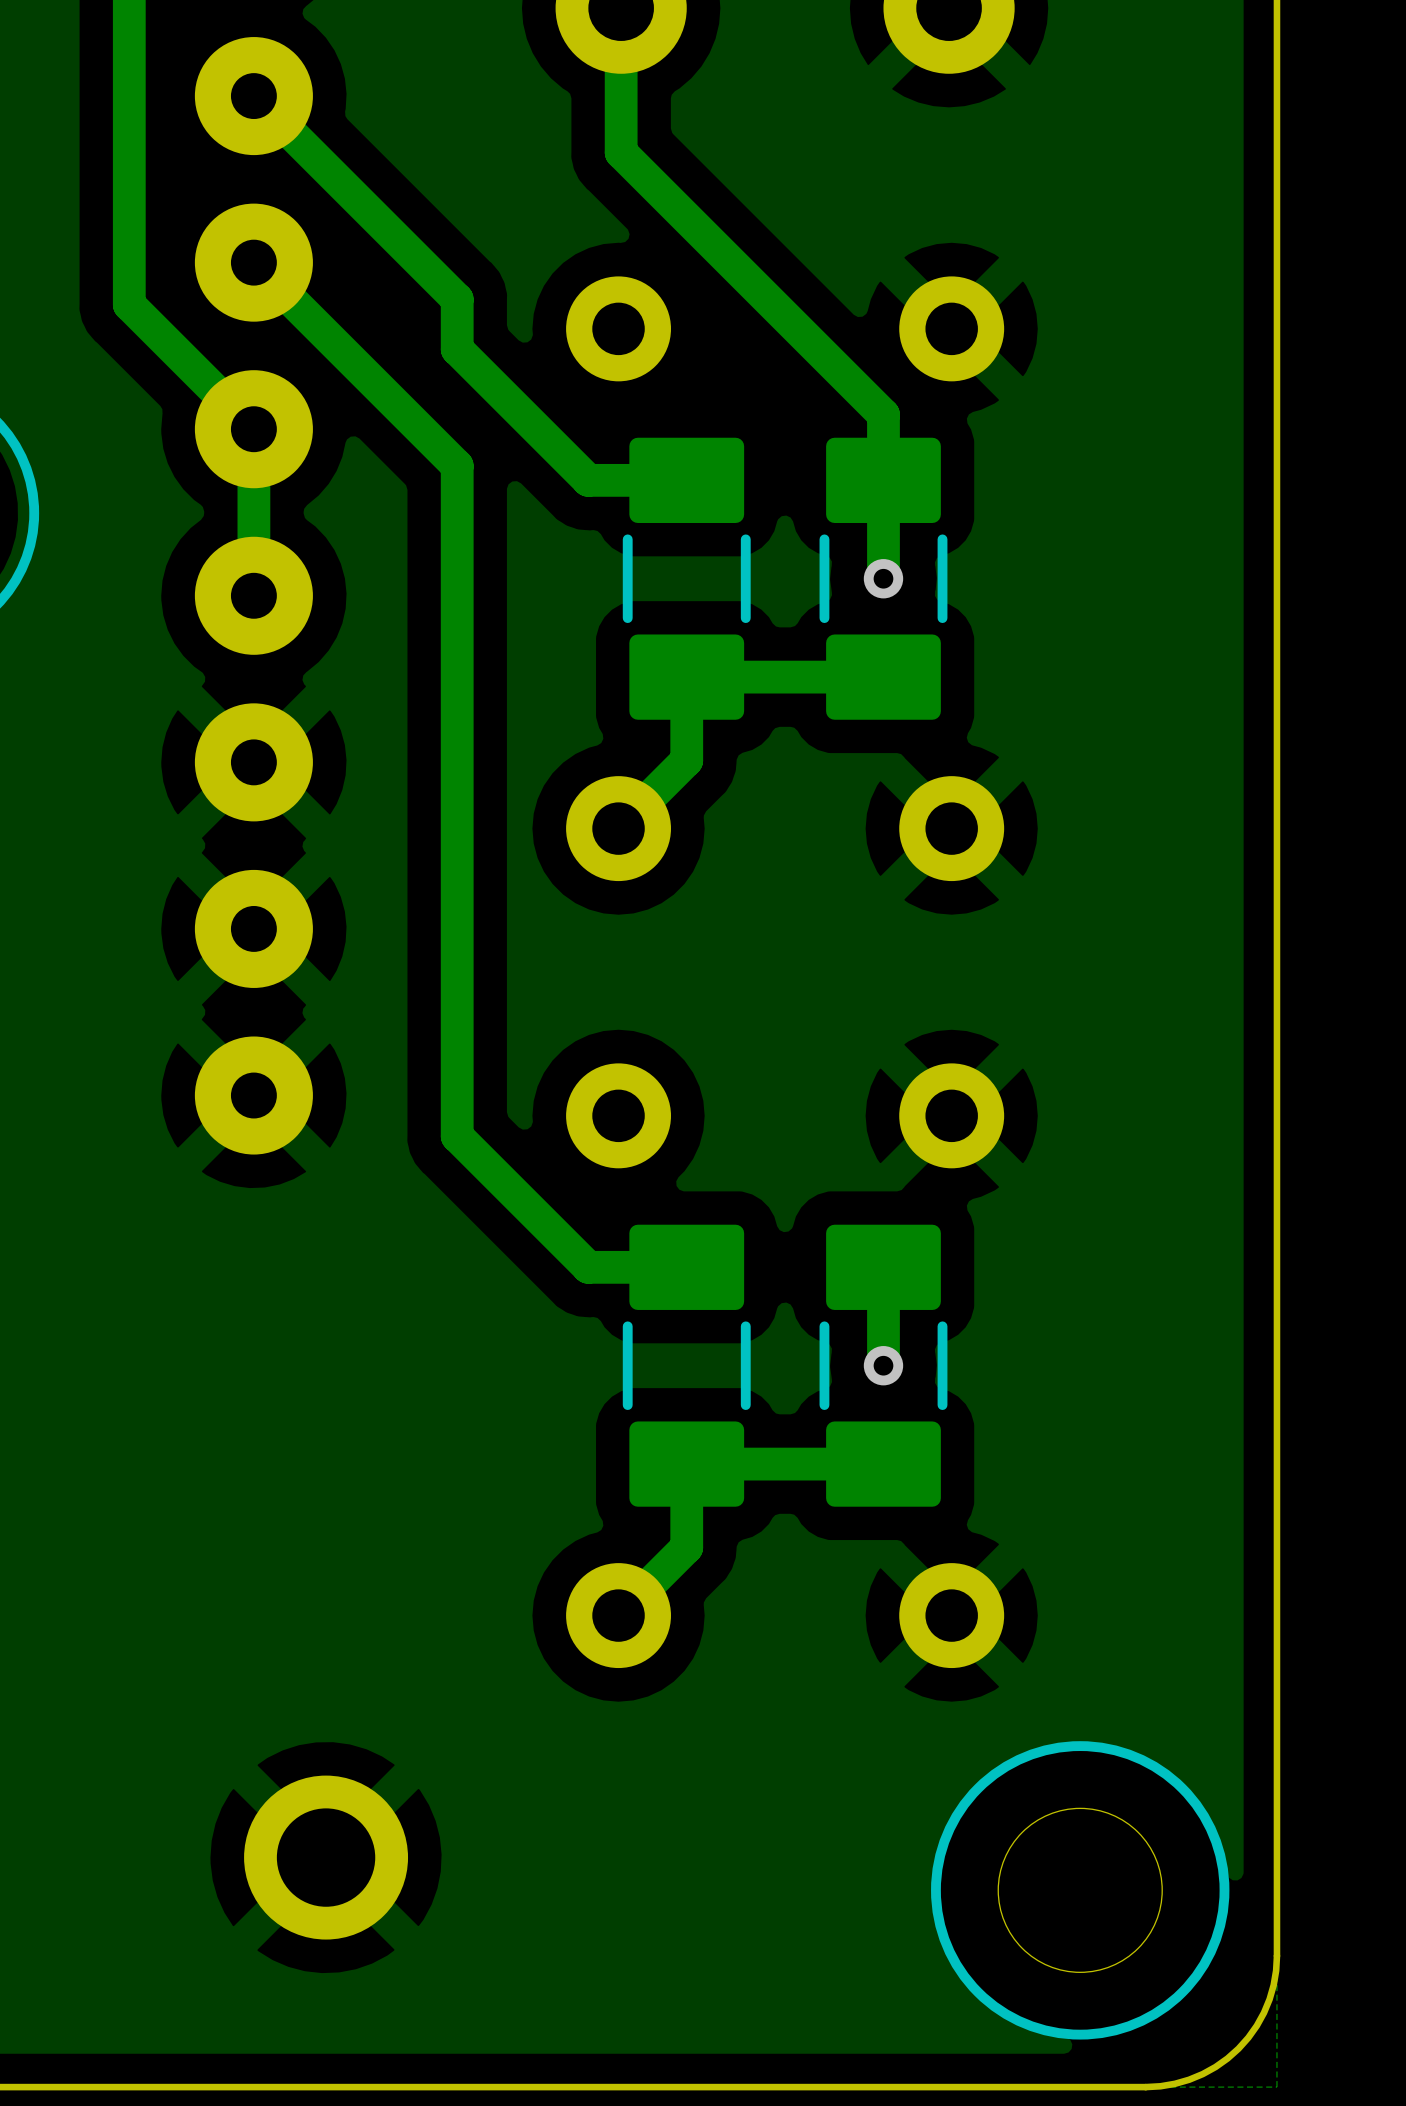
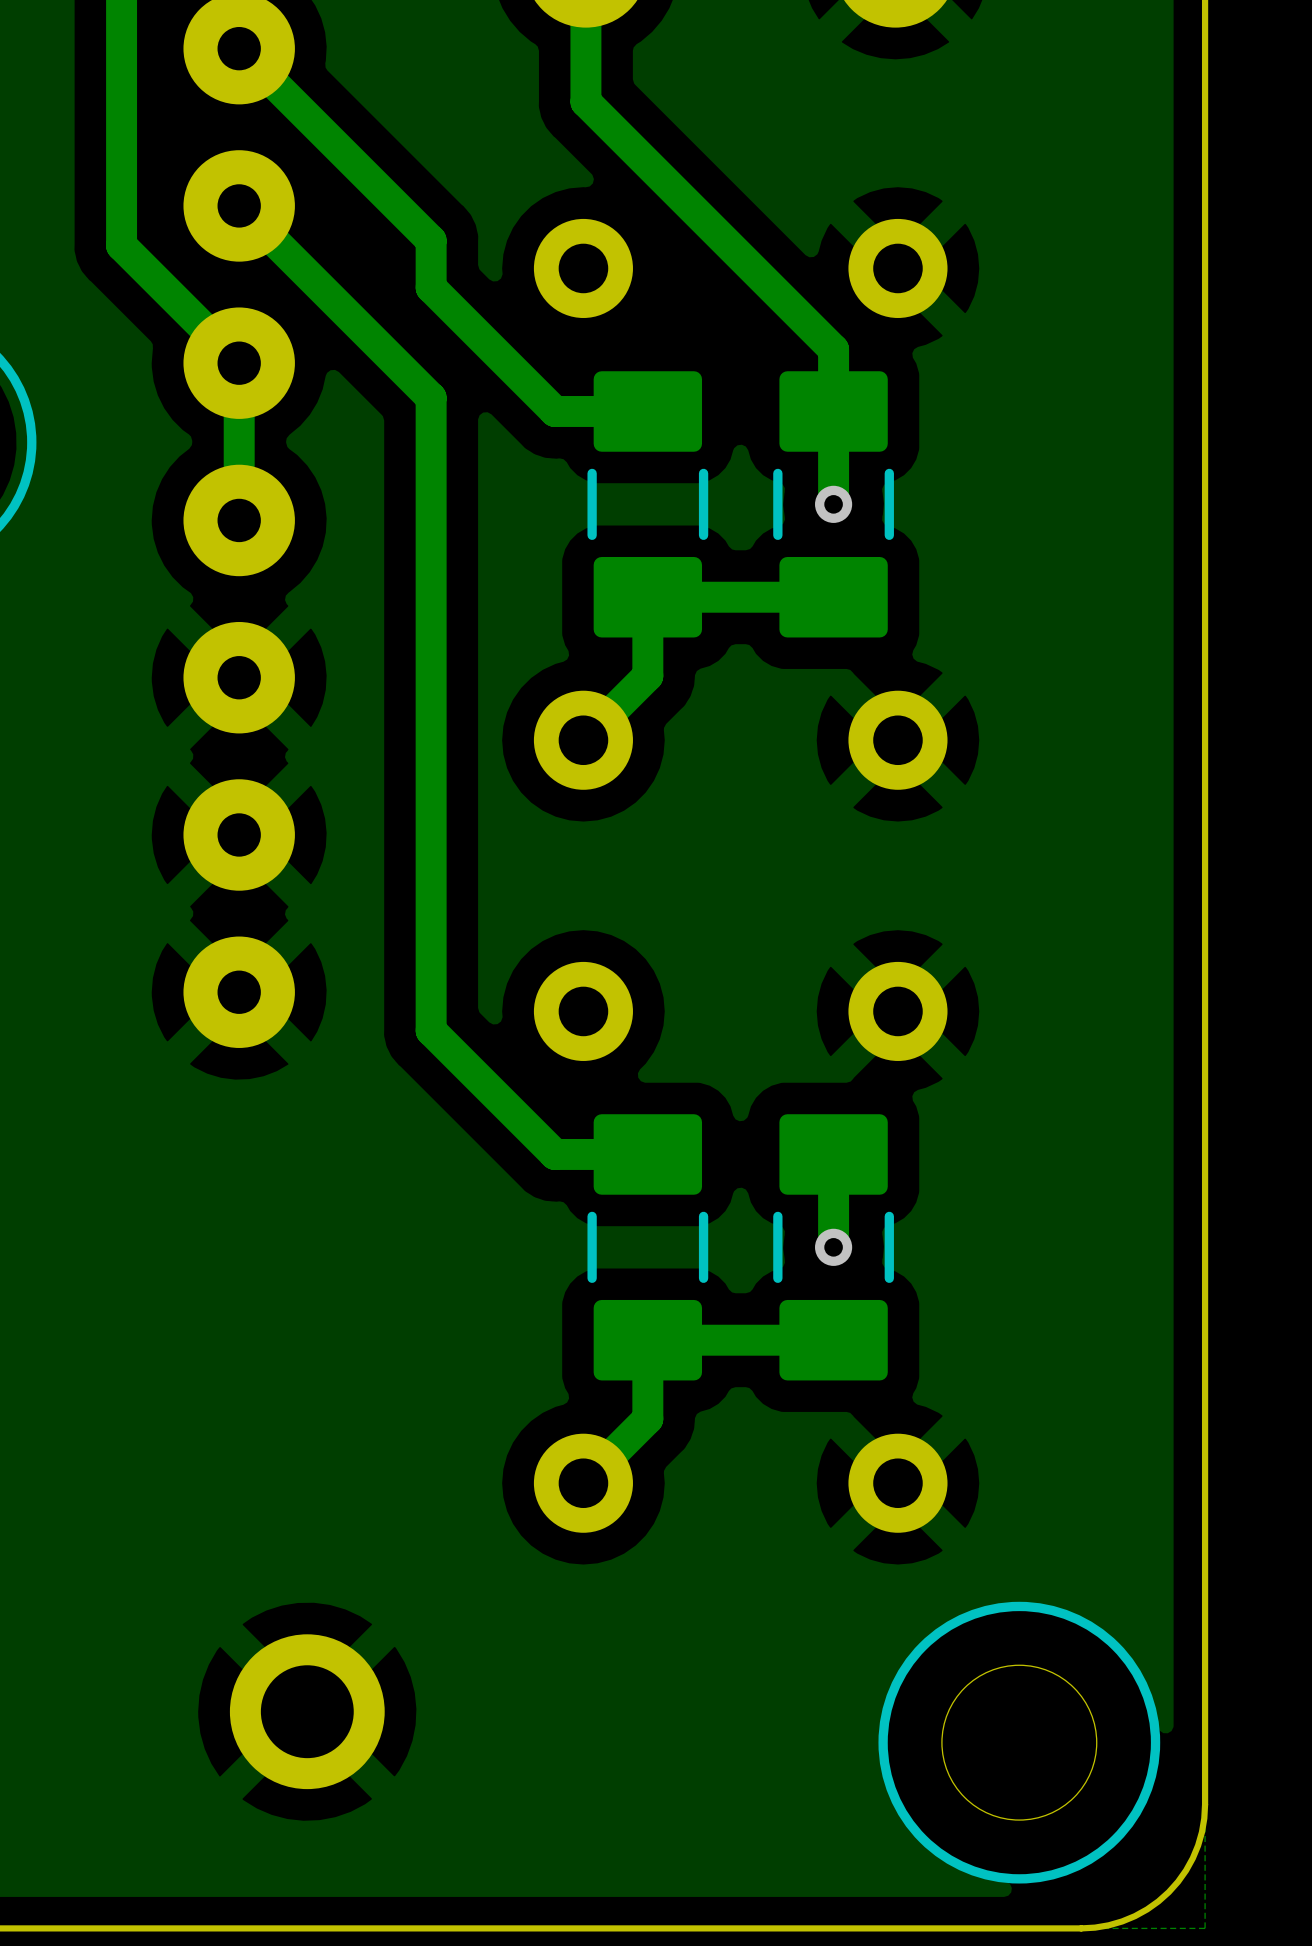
part footprint: [622, 437, 751, 720] -> [587, 371, 709, 638]
part footprint: [819, 437, 948, 720] -> [773, 371, 894, 638]
part footprint: [622, 1224, 751, 1507] -> [587, 1114, 709, 1381]
part footprint: [819, 1224, 948, 1507] -> [773, 1114, 894, 1381]

